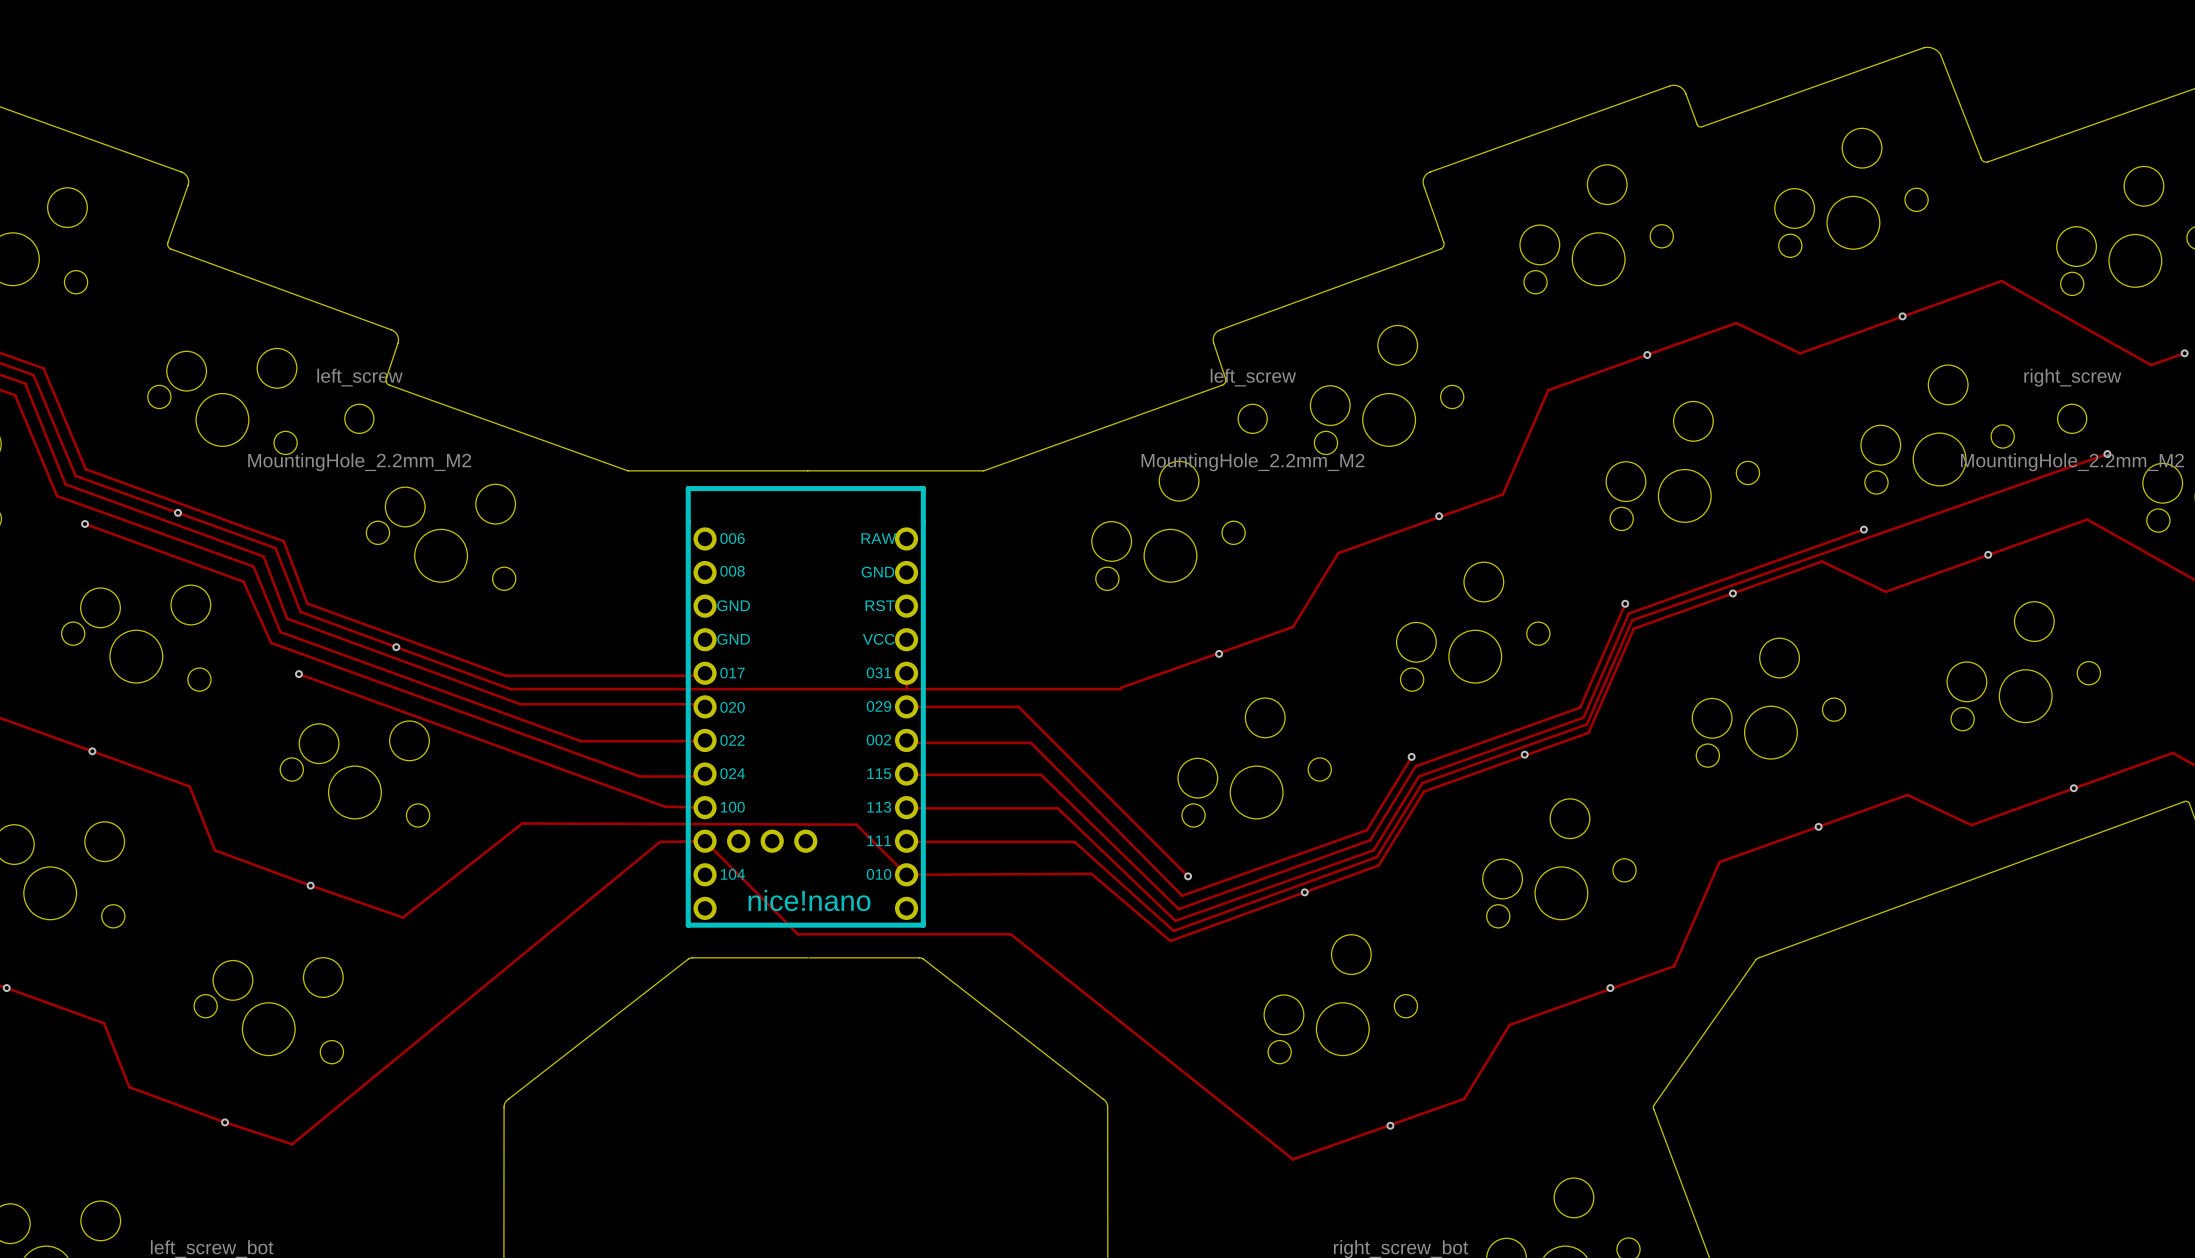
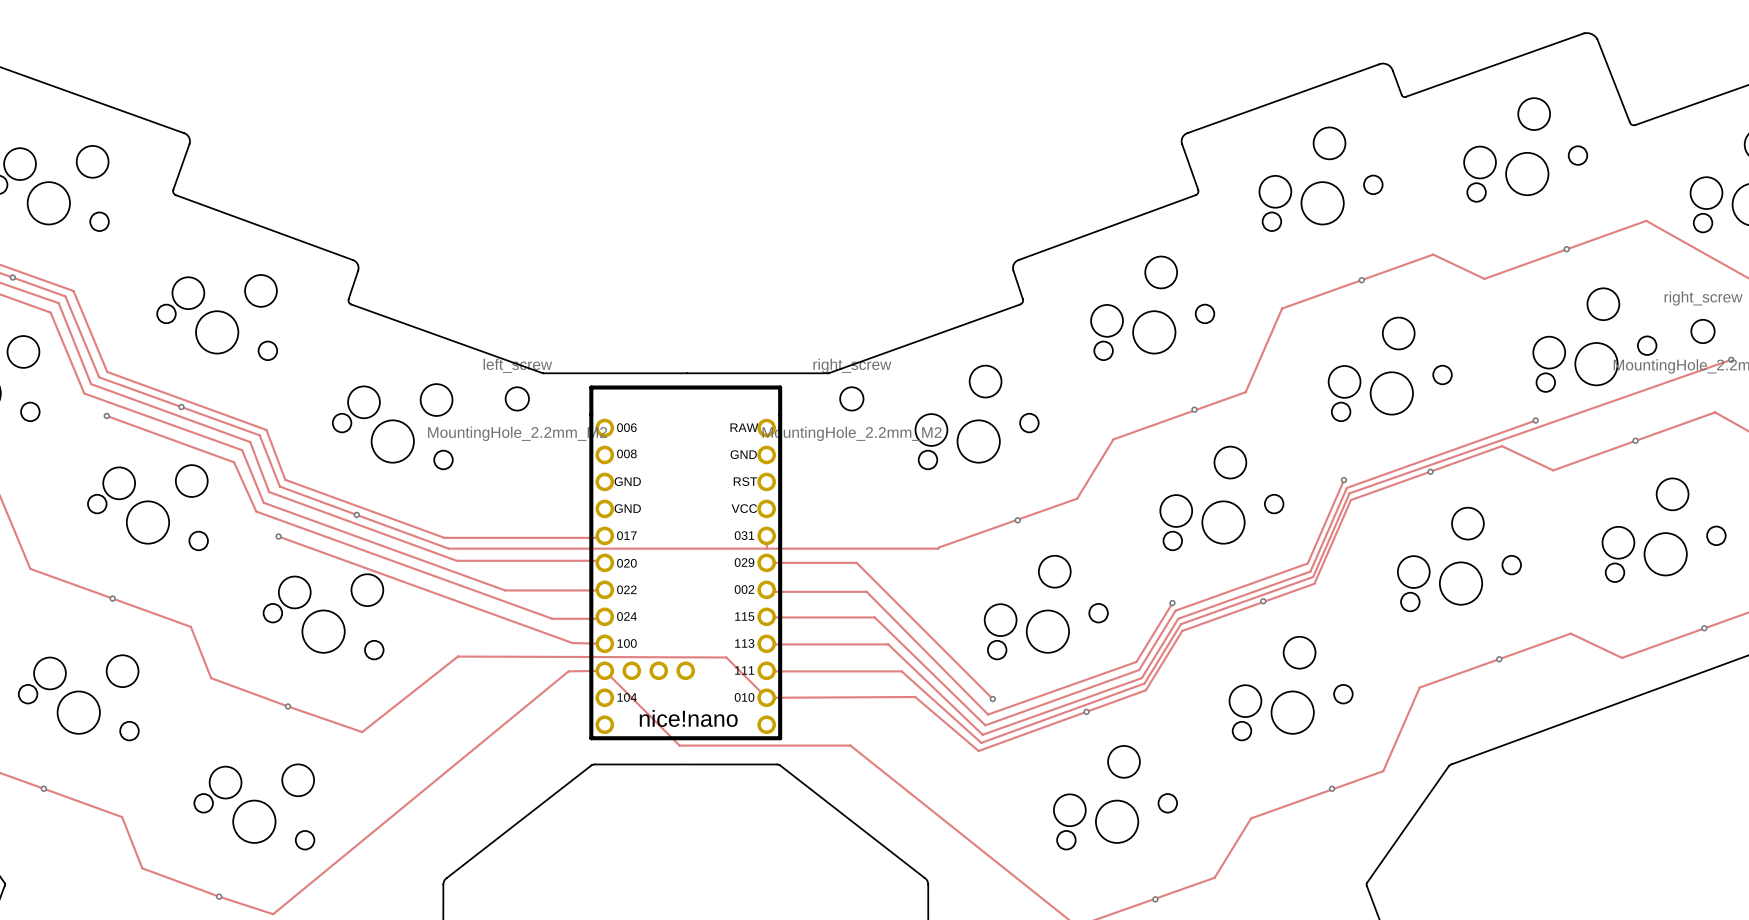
left_screw position: (359, 418) -> (517, 398)
left_screw: MountingHole_2.2mm_M2 (1252, 418) -> none
right_screw: none -> MountingHole_2.2mm_M2 (851, 398)

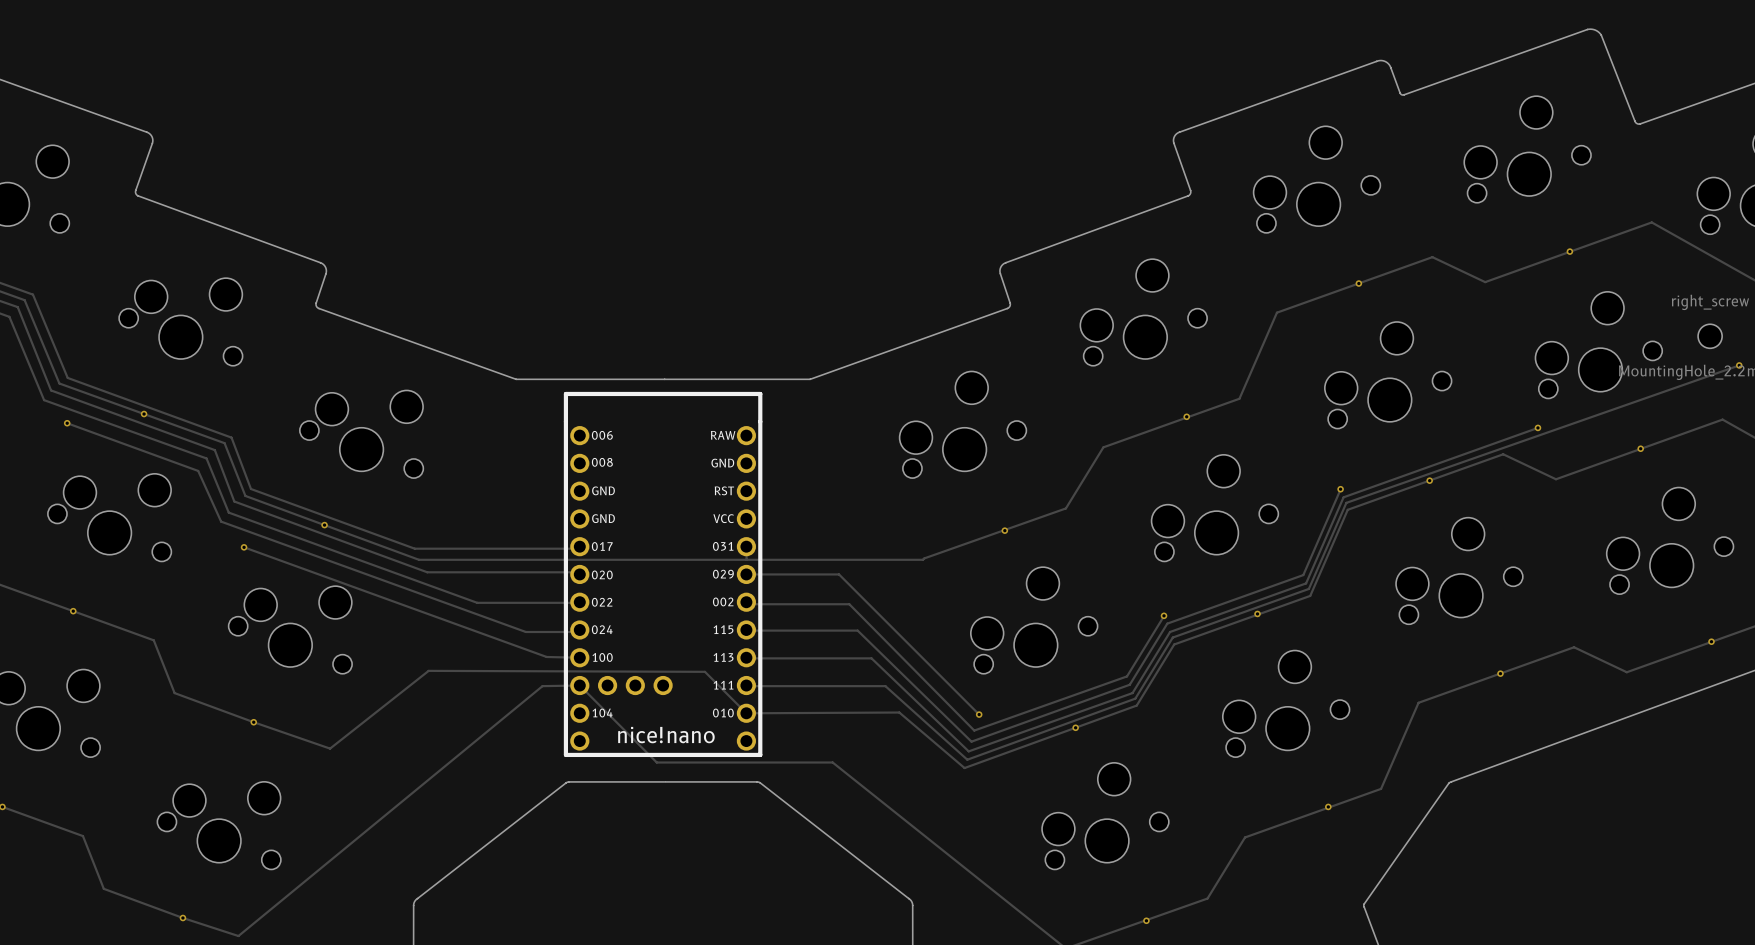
left_screw: MountingHole_2.2mm_M2 (517, 398) -> none
right_screw: MountingHole_2.2mm_M2 (851, 398) -> none

